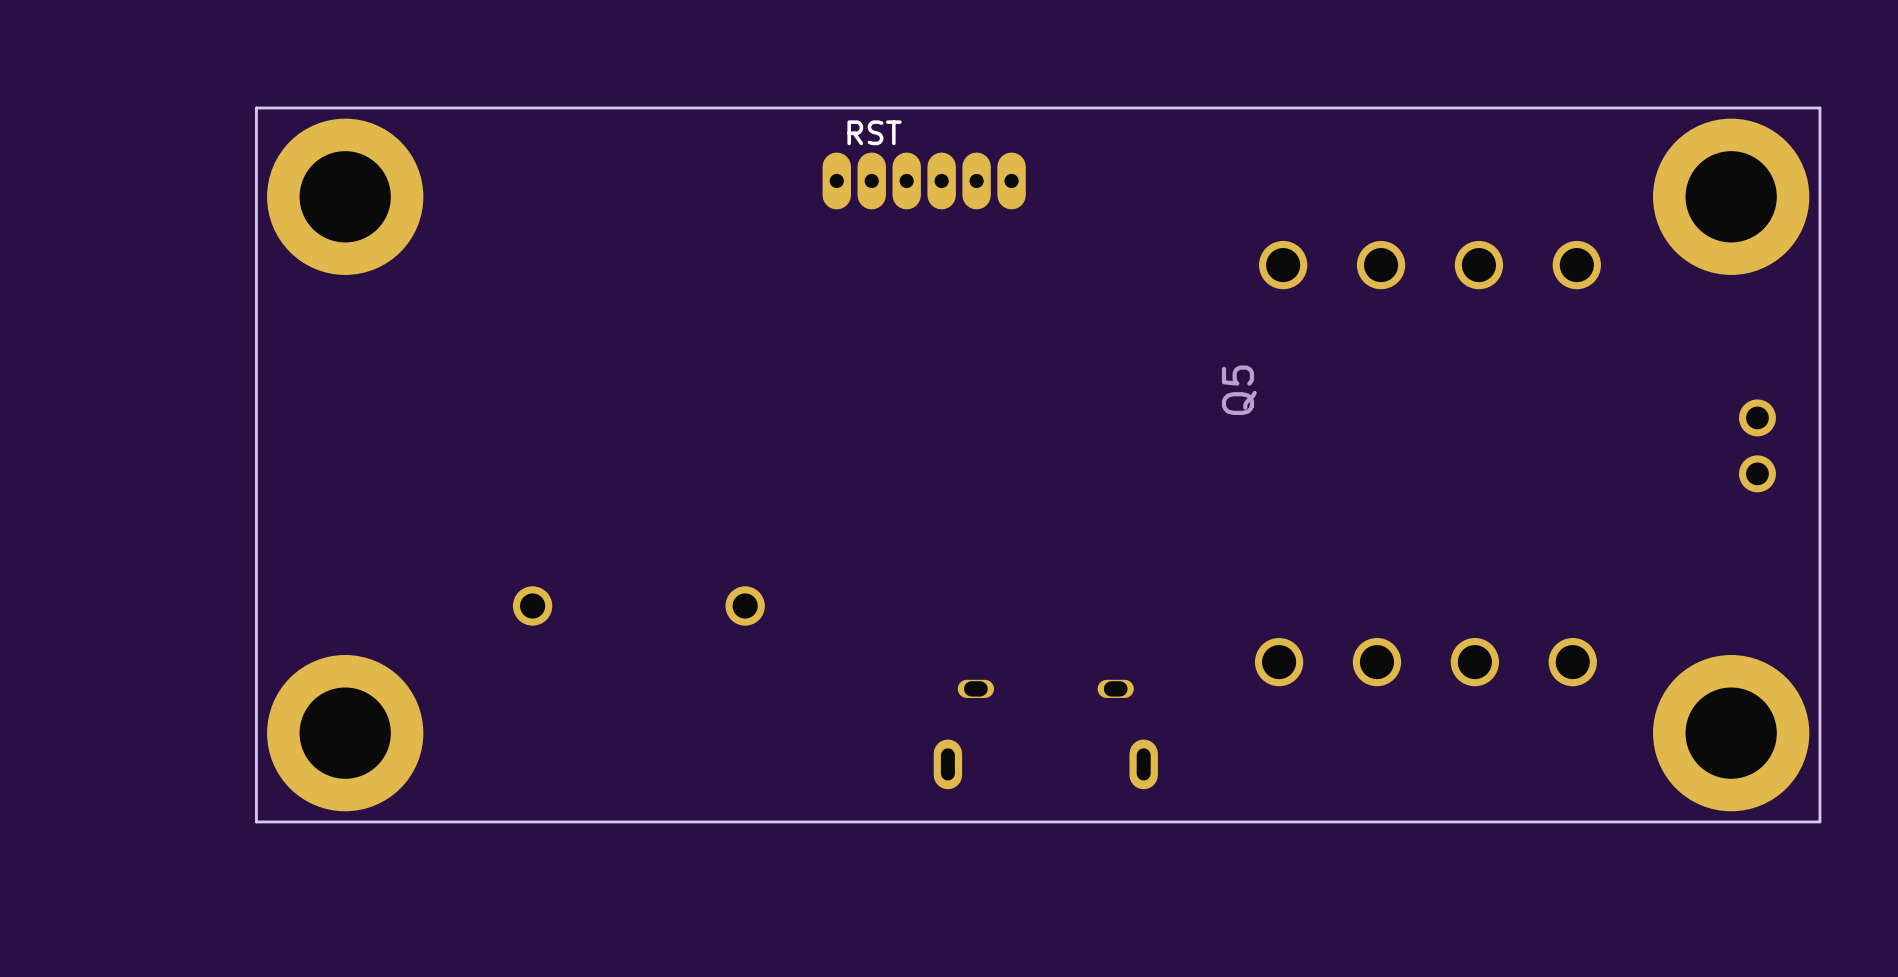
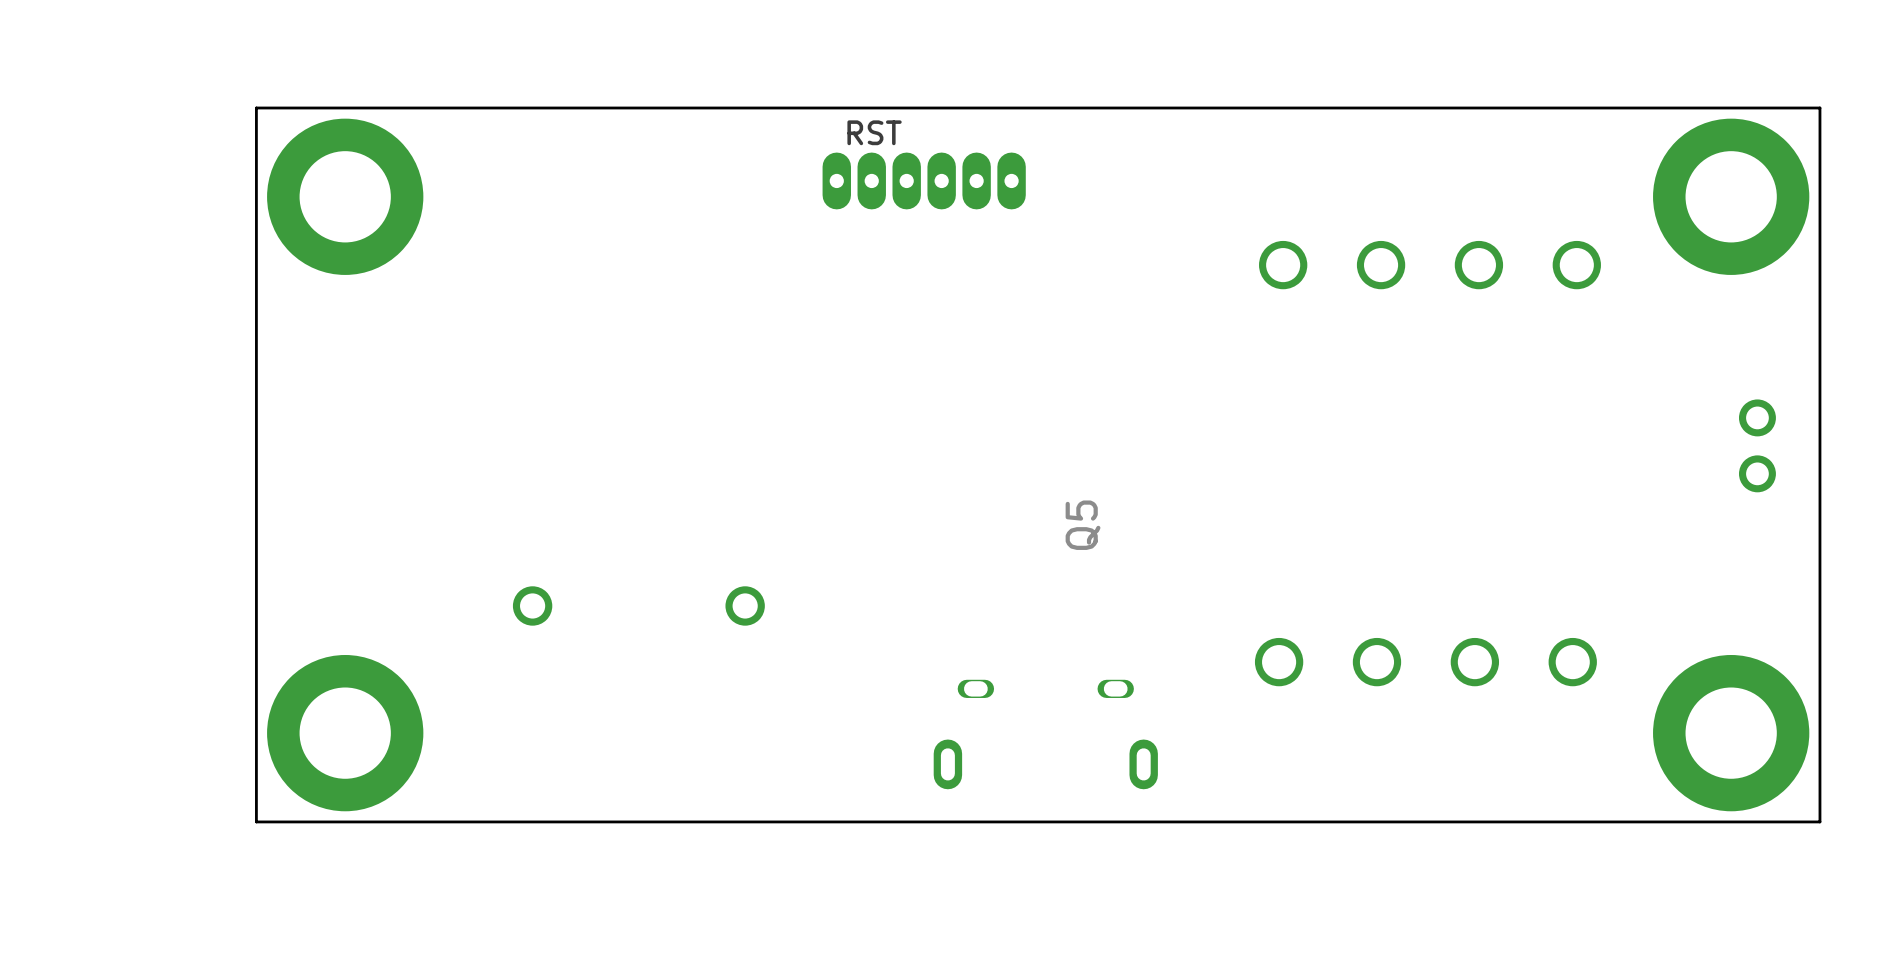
Q5 position: (1239, 390) -> (1083, 525)

